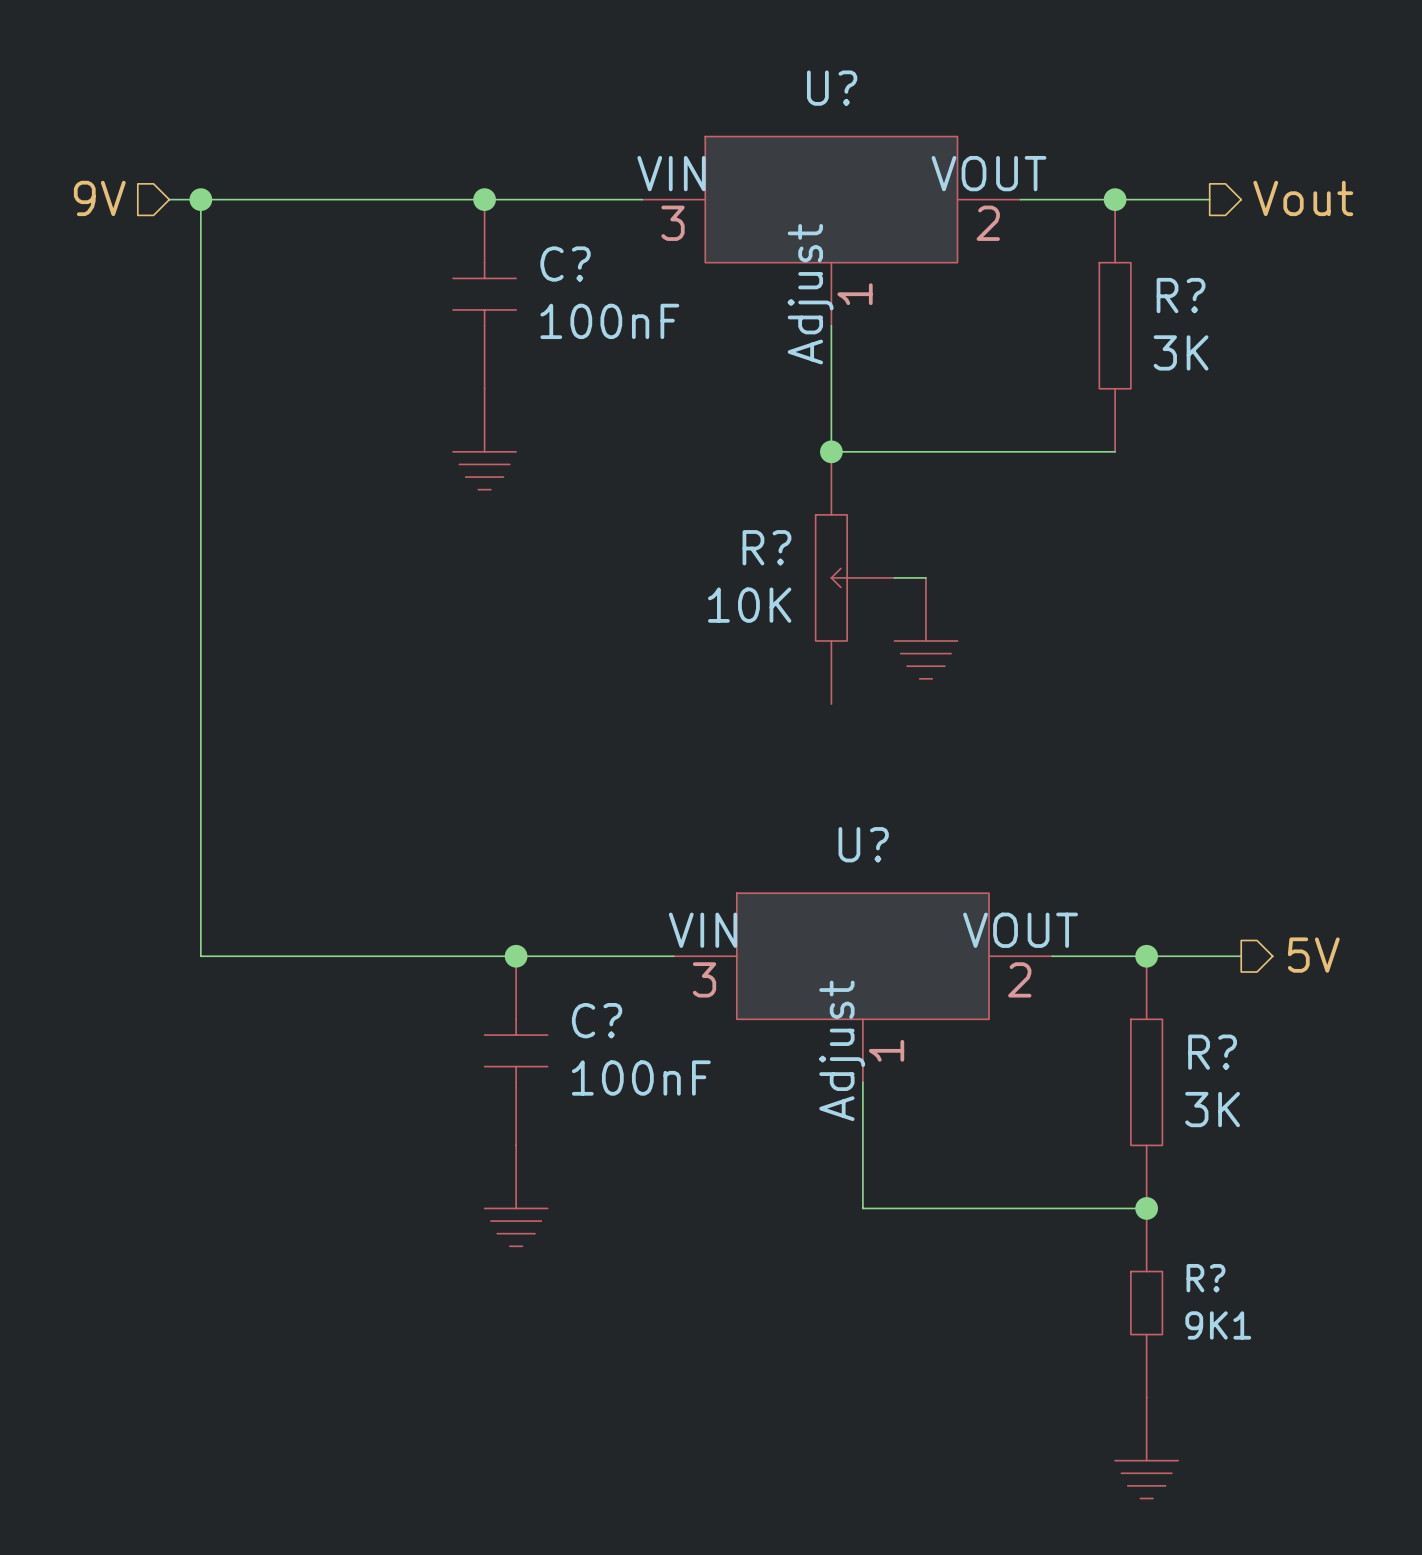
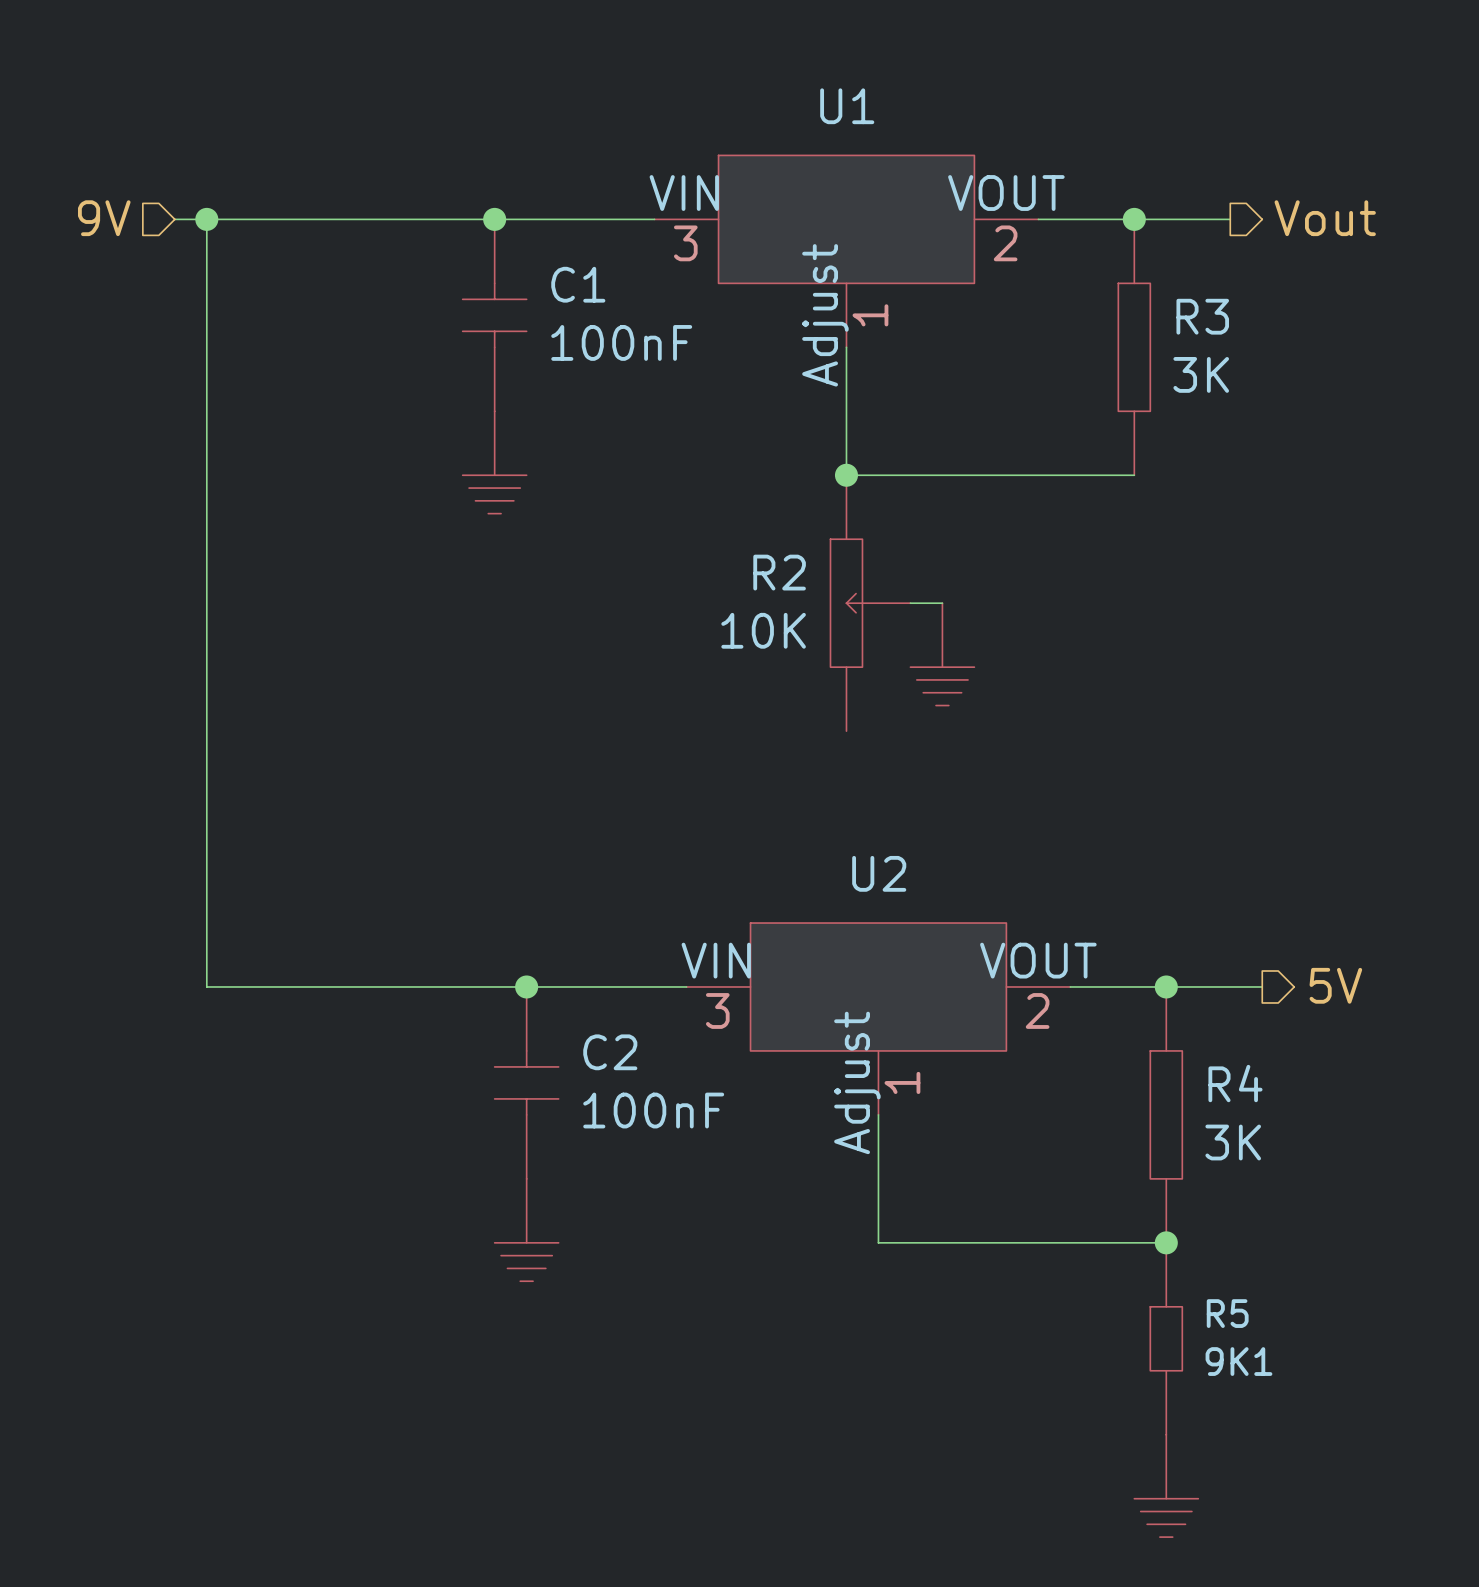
U? name: U? (832, 88) -> U1 (847, 106)
C? name: C? (565, 264) -> C1 (578, 284)
R? name: R? (1181, 295) -> R3 (1202, 316)
R? name: R? (766, 547) -> R2 (779, 572)
U? name: U? (863, 844) -> U2 (879, 873)
C? name: C? (597, 1020) -> C2 (610, 1052)
R? name: R? (1212, 1052) -> R4 (1235, 1083)
R? name: R? (1205, 1278) -> R5 (1227, 1313)

